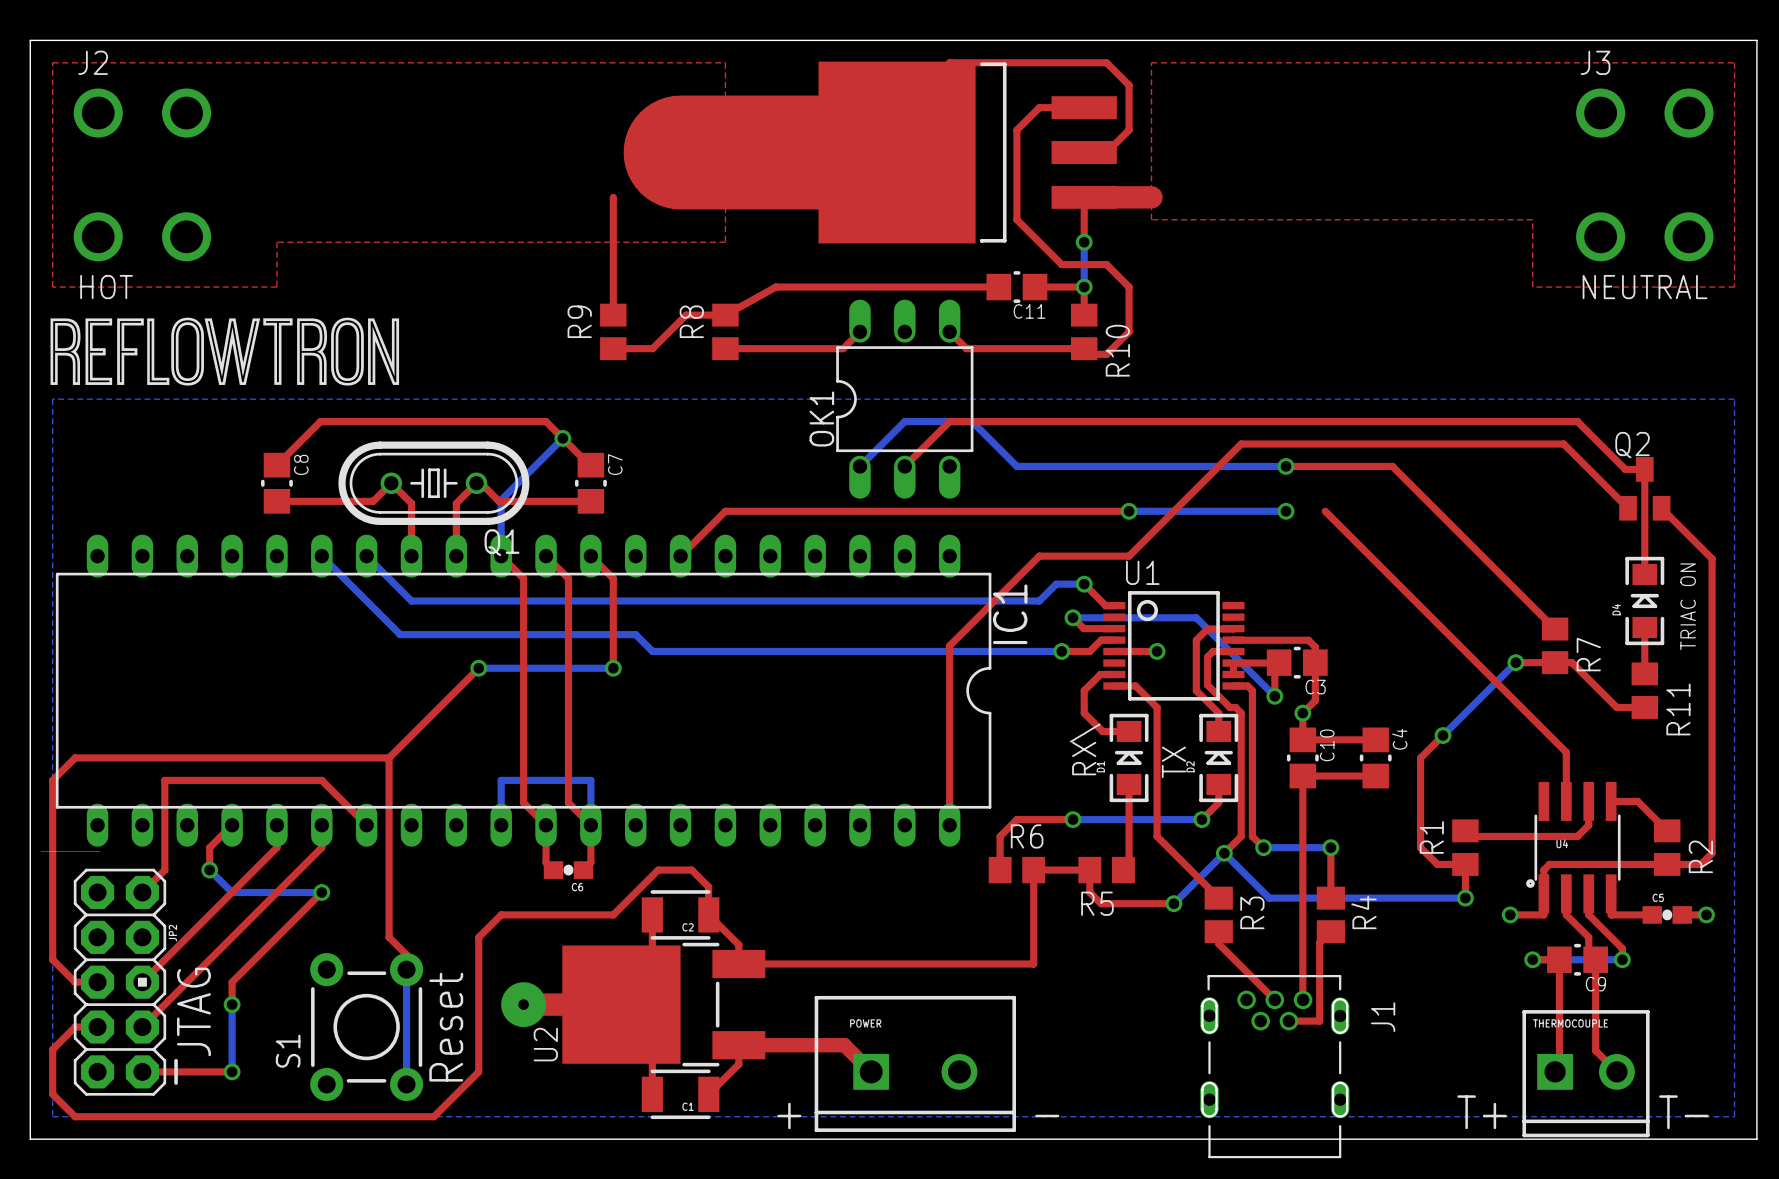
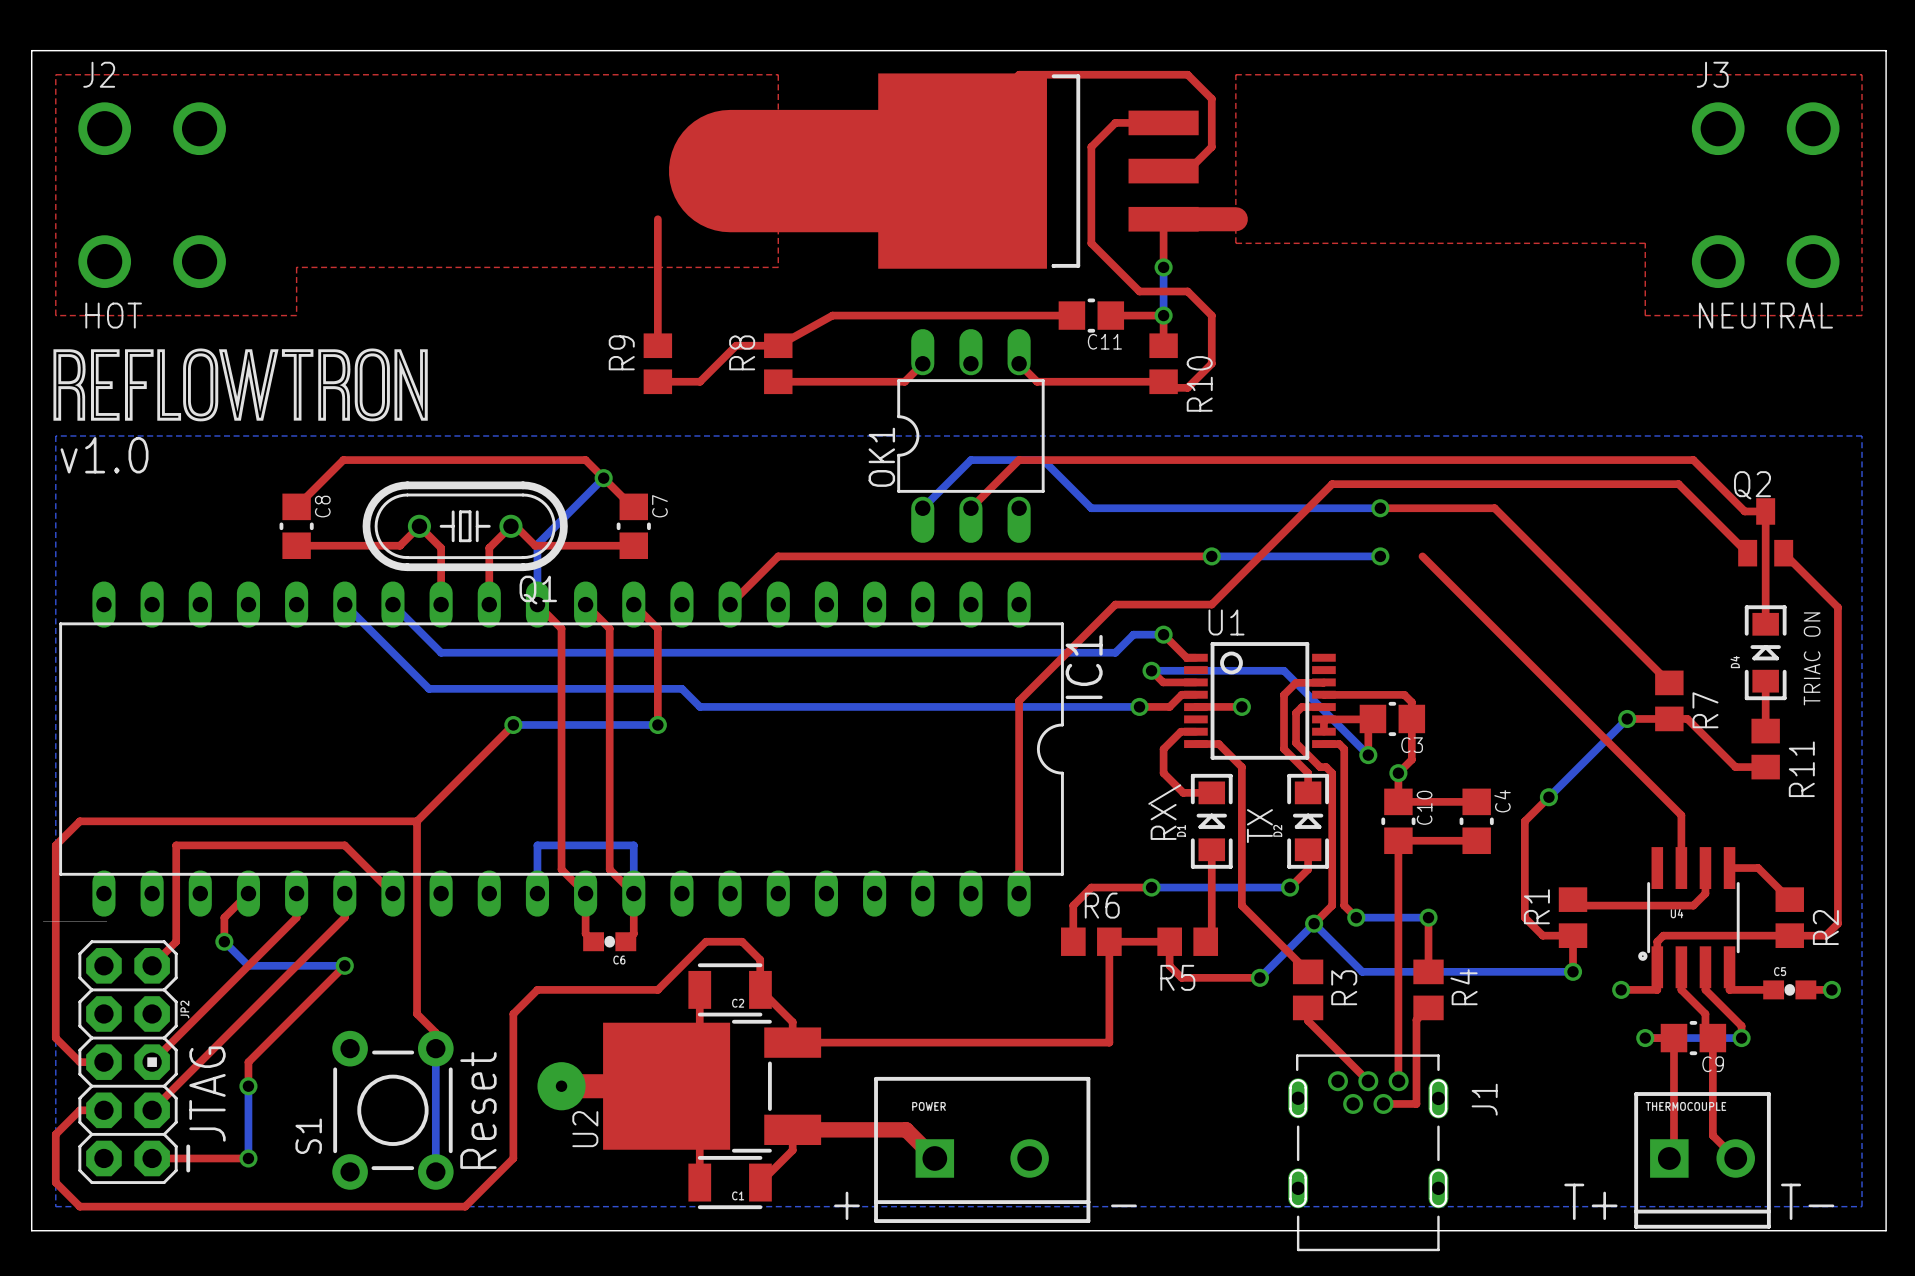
text: none -> v1.0 (104, 455)

